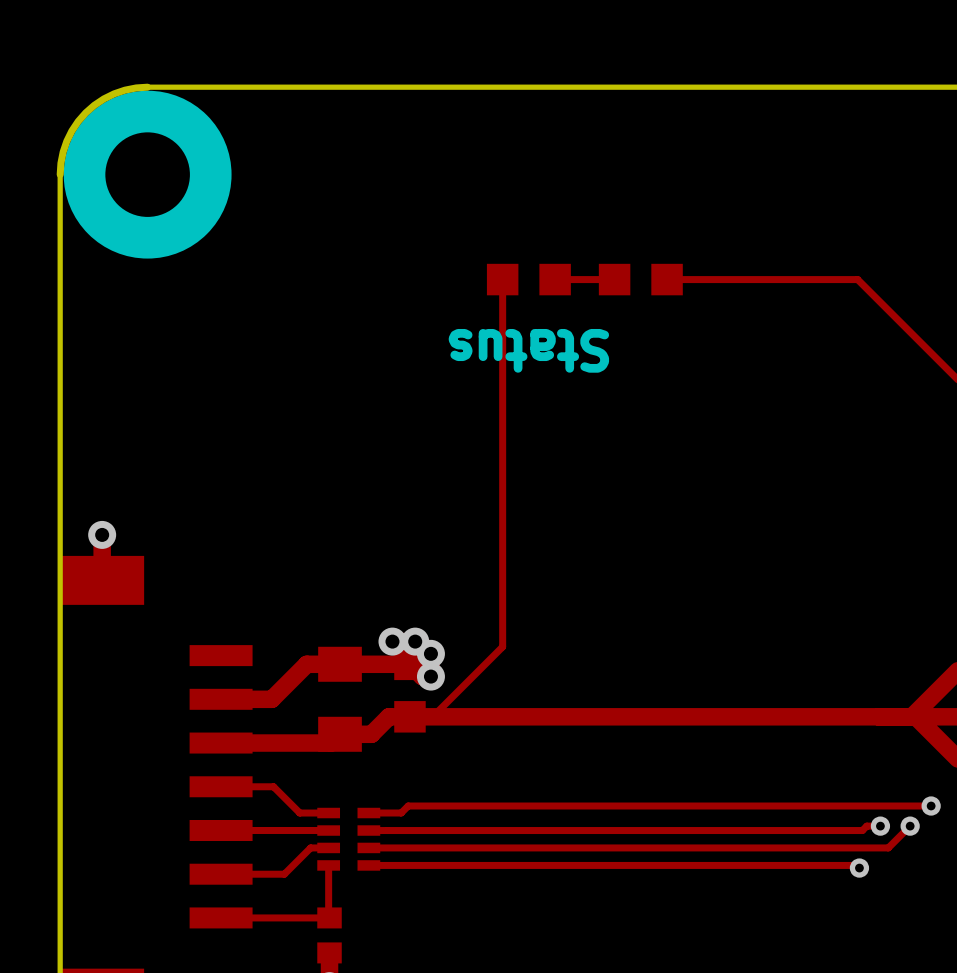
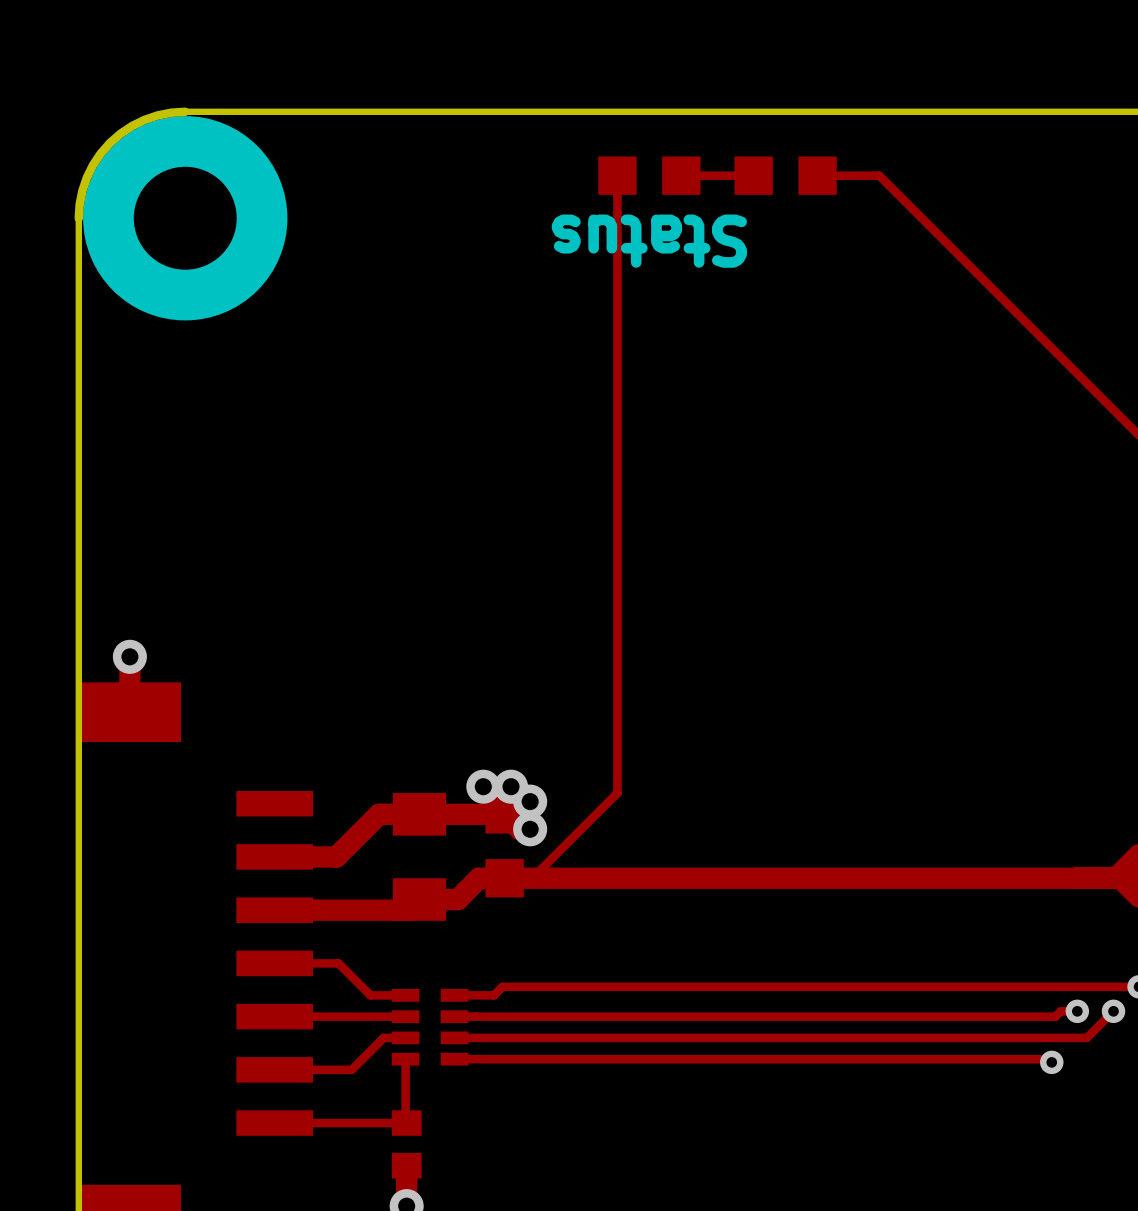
track: none -> (617, 175) (617, 346)
part: none -> (649, 175)
track: none -> (679, 175) (753, 175)
part: none -> (785, 175)
part: (528, 279) -> none
track: (555, 279) (614, 279) -> none
part: (640, 279) -> none
track: (667, 279) (857, 279) -> (817, 175) (879, 175) (1049, 346)
text position: Status (528, 350) -> Status (649, 241)

